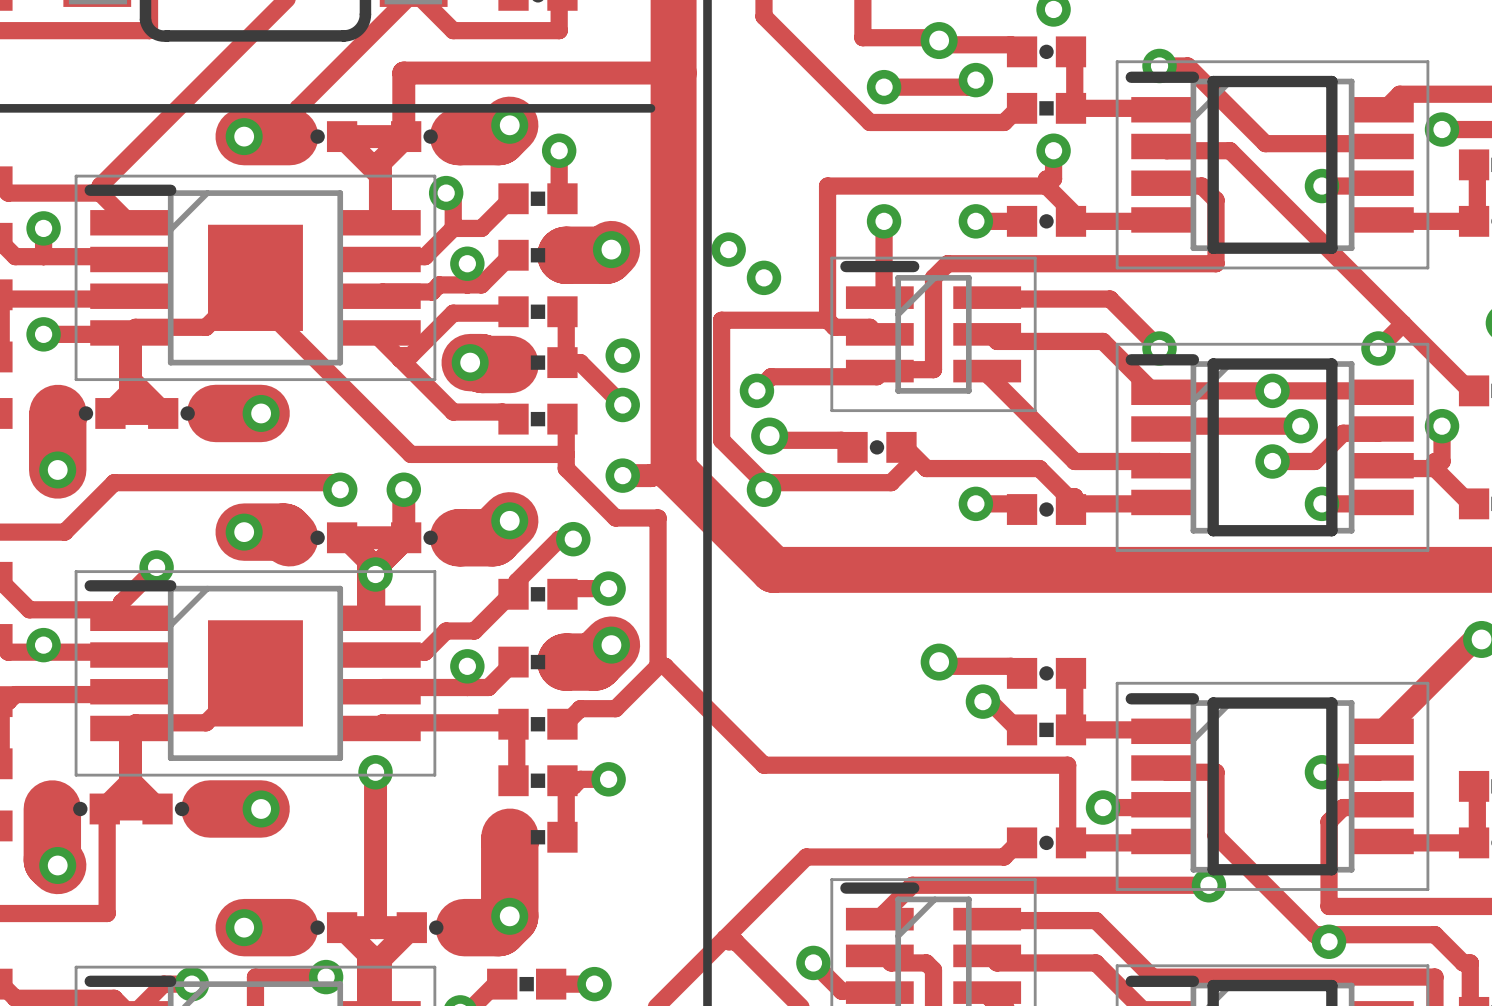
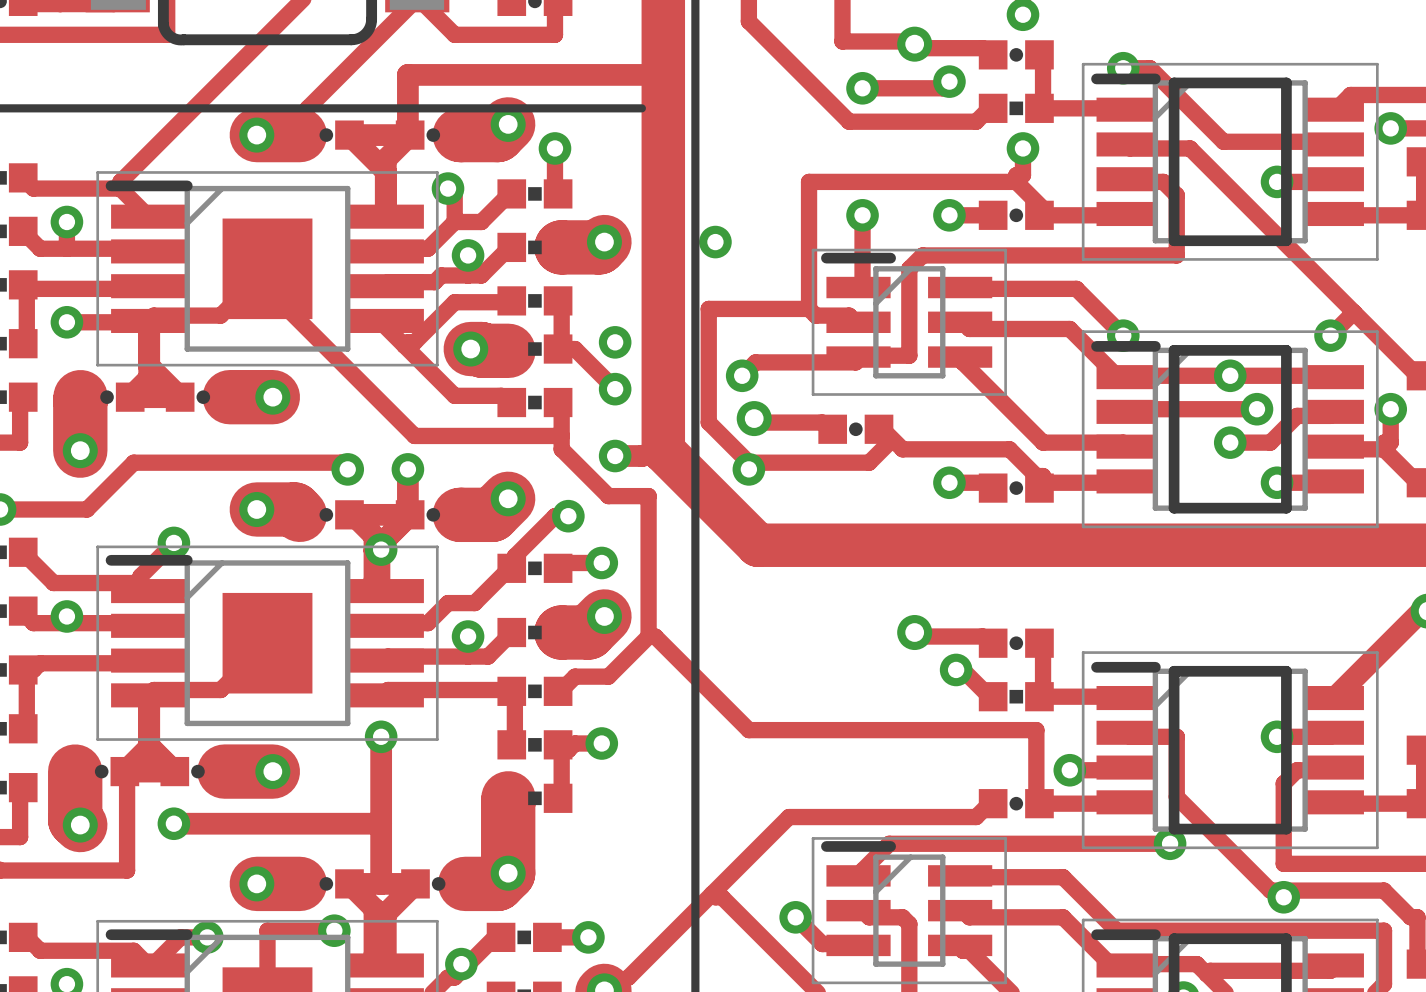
via: (763, 277) -> none
track: none -> (173, 823) (381, 823)
via: none -> (173, 823)

